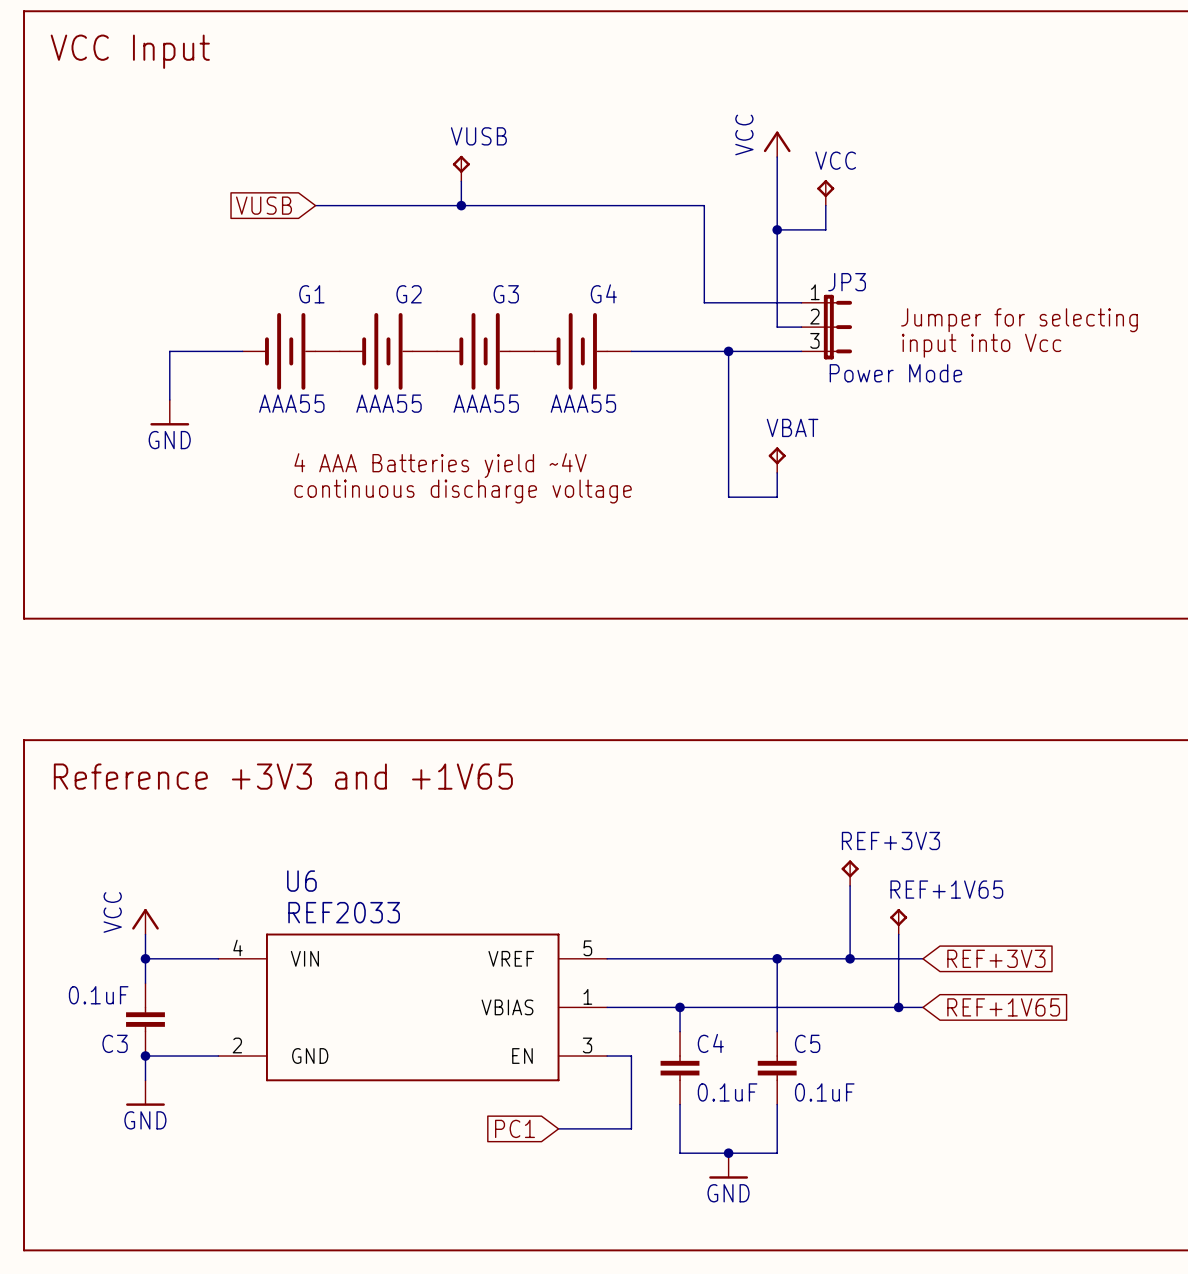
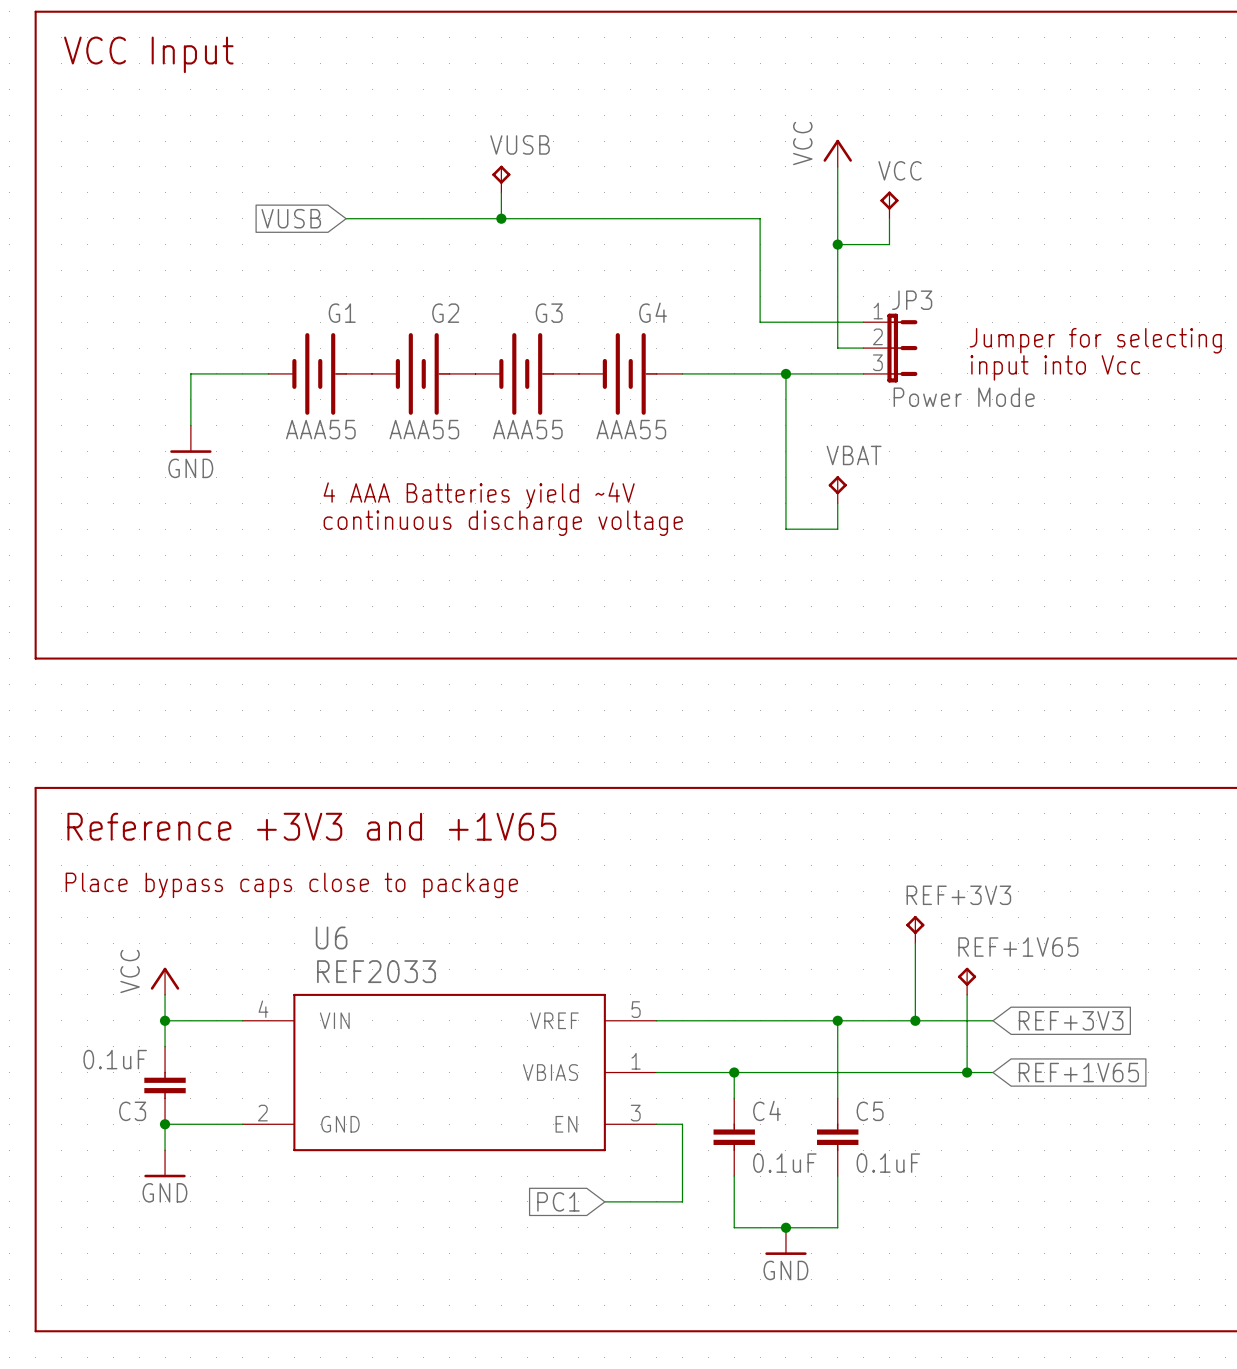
text: none -> Place bypass caps close to package (291, 885)

